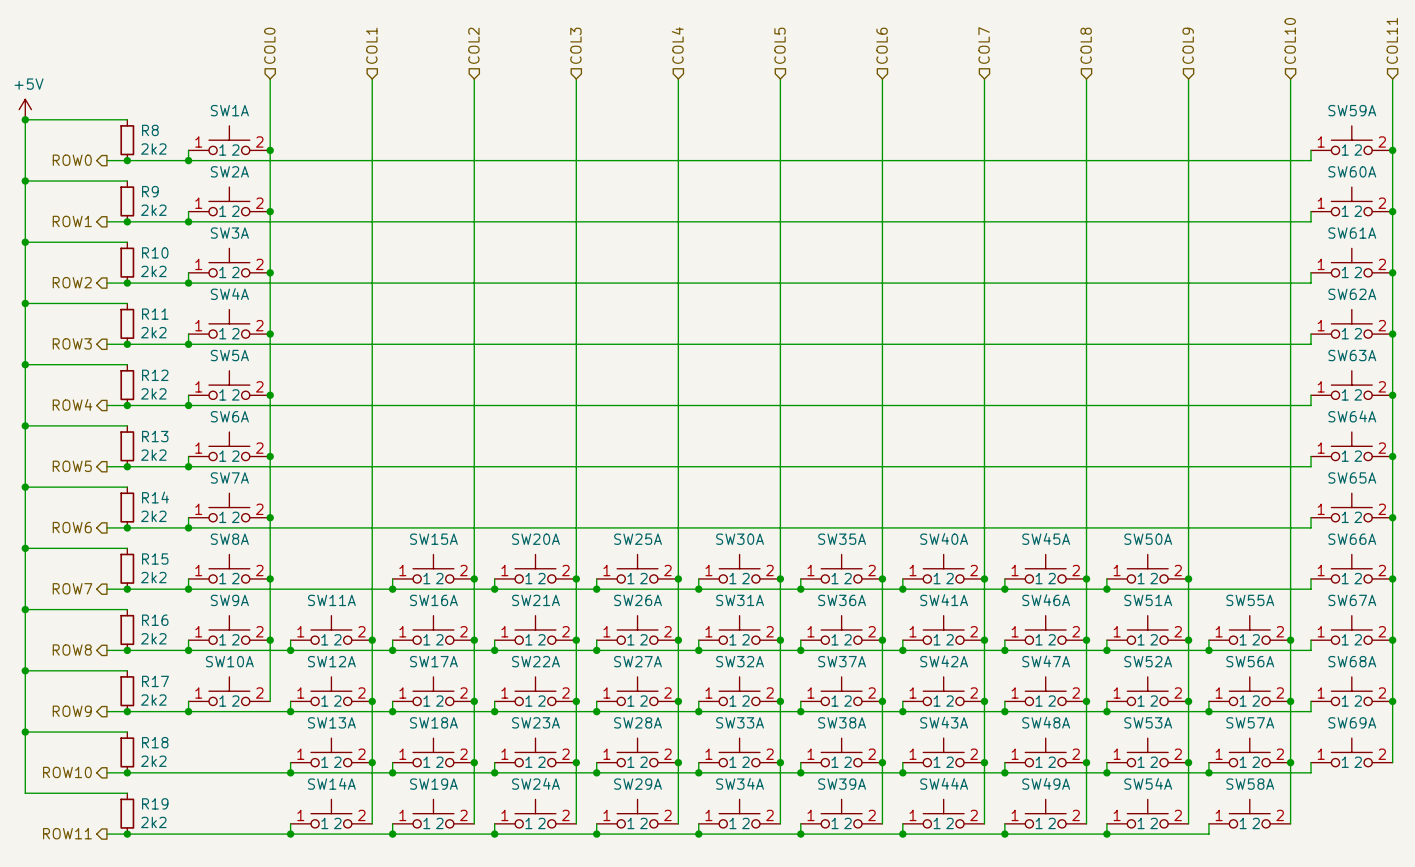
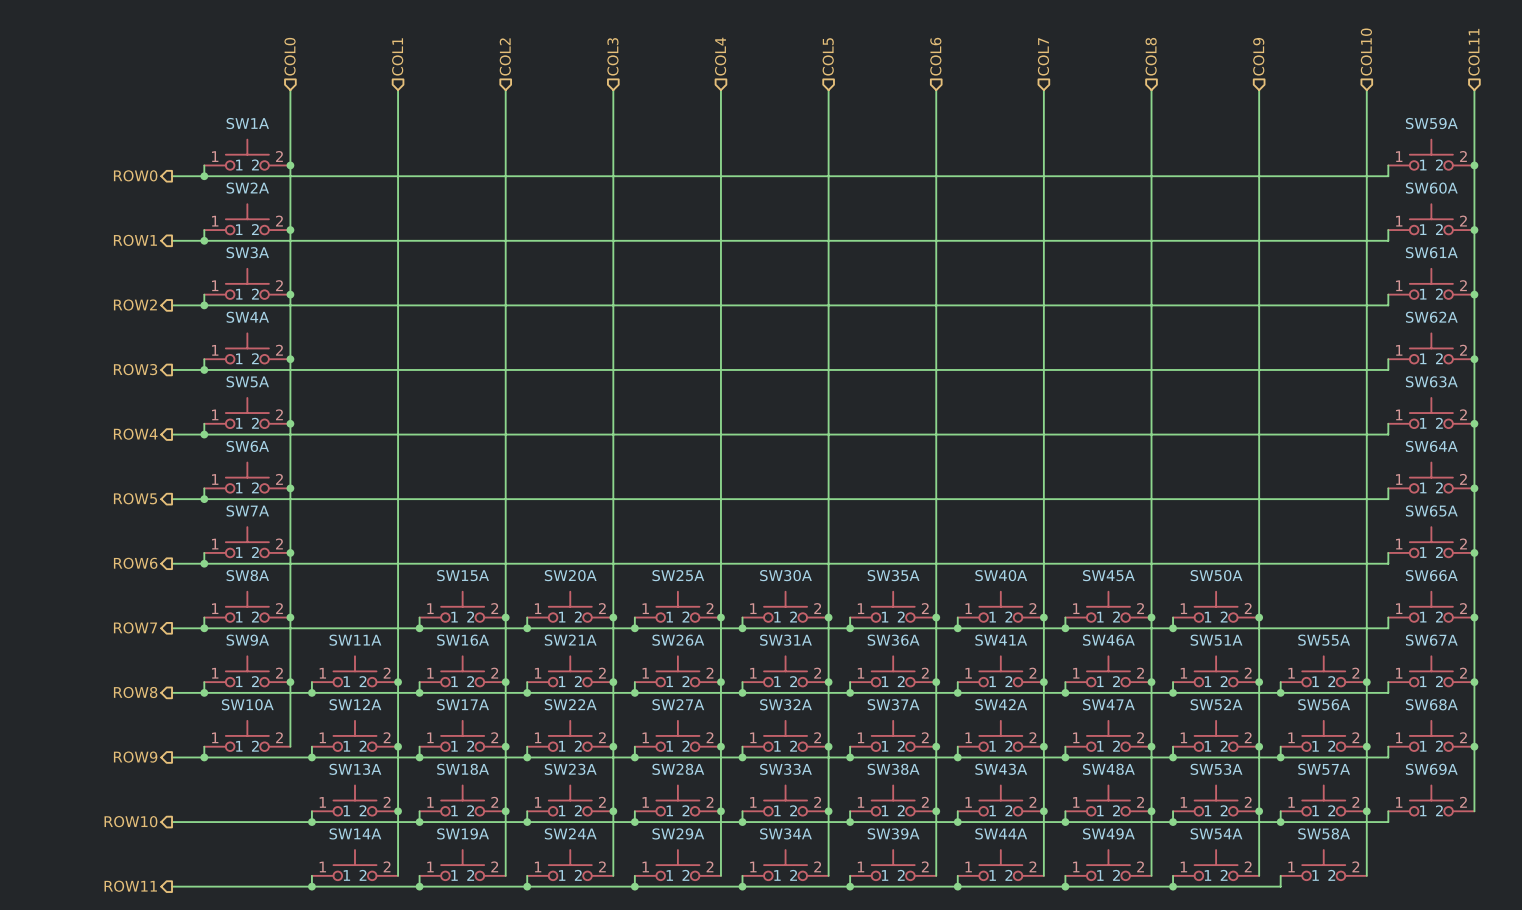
power symbol: +5V (25, 109) -> none
junction: (25, 119) -> none
wire: (127, 119) (25, 119) (25, 793) (127, 793) -> none
R8: 2k2 (127, 140) -> none
hierarchical label position: ROW0 (72, 160) -> ROW0 (135, 175)
wire: (106, 160) (157, 160) -> none
junction: (127, 160) -> none
wire: (25, 181) (127, 181) -> none
junction: (25, 181) -> none
R9: 2k2 (127, 201) -> none
hierarchical label position: ROW1 (72, 221) -> ROW1 (135, 240)
wire: (106, 221) (157, 221) -> none
junction: (127, 221) -> none
wire: (25, 242) (127, 242) -> none
junction: (25, 242) -> none
R10: 2k2 (127, 262) -> none
hierarchical label position: ROW2 (72, 282) -> ROW2 (135, 305)
wire: (106, 283) (157, 283) -> none
junction: (127, 283) -> none
wire: (25, 303) (127, 303) -> none
junction: (25, 303) -> none
R11: 2k2 (127, 323) -> none
hierarchical label position: ROW3 (72, 343) -> ROW3 (135, 369)
wire: (106, 344) (157, 344) -> none
junction: (127, 344) -> none
wire: (25, 364) (127, 364) -> none
junction: (25, 364) -> none
R12: 2k2 (127, 385) -> none
hierarchical label position: ROW4 (72, 404) -> ROW4 (135, 434)
wire: (106, 405) (157, 405) -> none
junction: (127, 405) -> none
wire: (25, 425) (127, 425) -> none
junction: (25, 425) -> none
R13: 2k2 (127, 446) -> none
hierarchical label position: ROW5 (72, 466) -> ROW5 (135, 498)
wire: (106, 466) (157, 466) -> none
junction: (127, 466) -> none
wire: (25, 487) (127, 487) -> none
junction: (25, 487) -> none
R14: 2k2 (127, 507) -> none
hierarchical label position: ROW6 (72, 527) -> ROW6 (135, 563)
wire: (106, 527) (157, 527) -> none
junction: (127, 527) -> none
wire: (25, 548) (127, 548) -> none
junction: (25, 548) -> none
R15: 2k2 (127, 568) -> none
hierarchical label position: ROW7 (72, 588) -> ROW7 (135, 627)
wire: (106, 589) (157, 589) -> none
junction: (127, 589) -> none
wire: (25, 609) (127, 609) -> none
junction: (25, 609) -> none
R16: 2k2 (127, 629) -> none
hierarchical label position: ROW8 (72, 650) -> ROW8 (135, 692)
wire: (106, 650) (157, 650) -> none
junction: (127, 650) -> none
wire: (25, 670) (127, 670) -> none
junction: (25, 670) -> none
R17: 2k2 (127, 691) -> none
hierarchical label position: ROW9 (72, 711) -> ROW9 (135, 757)
wire: (106, 711) (157, 711) -> none
junction: (127, 711) -> none
wire: (25, 732) (127, 732) -> none
junction: (25, 732) -> none
R18: 2k2 (127, 752) -> none
hierarchical label position: ROW10 (67, 772) -> ROW10 (130, 821)
wire: (106, 772) (157, 772) -> none
junction: (127, 772) -> none
R19: 2k2 (127, 813) -> none
hierarchical label position: ROW11 (67, 833) -> ROW11 (130, 886)
wire: (106, 834) (157, 834) -> none
junction: (127, 834) -> none

